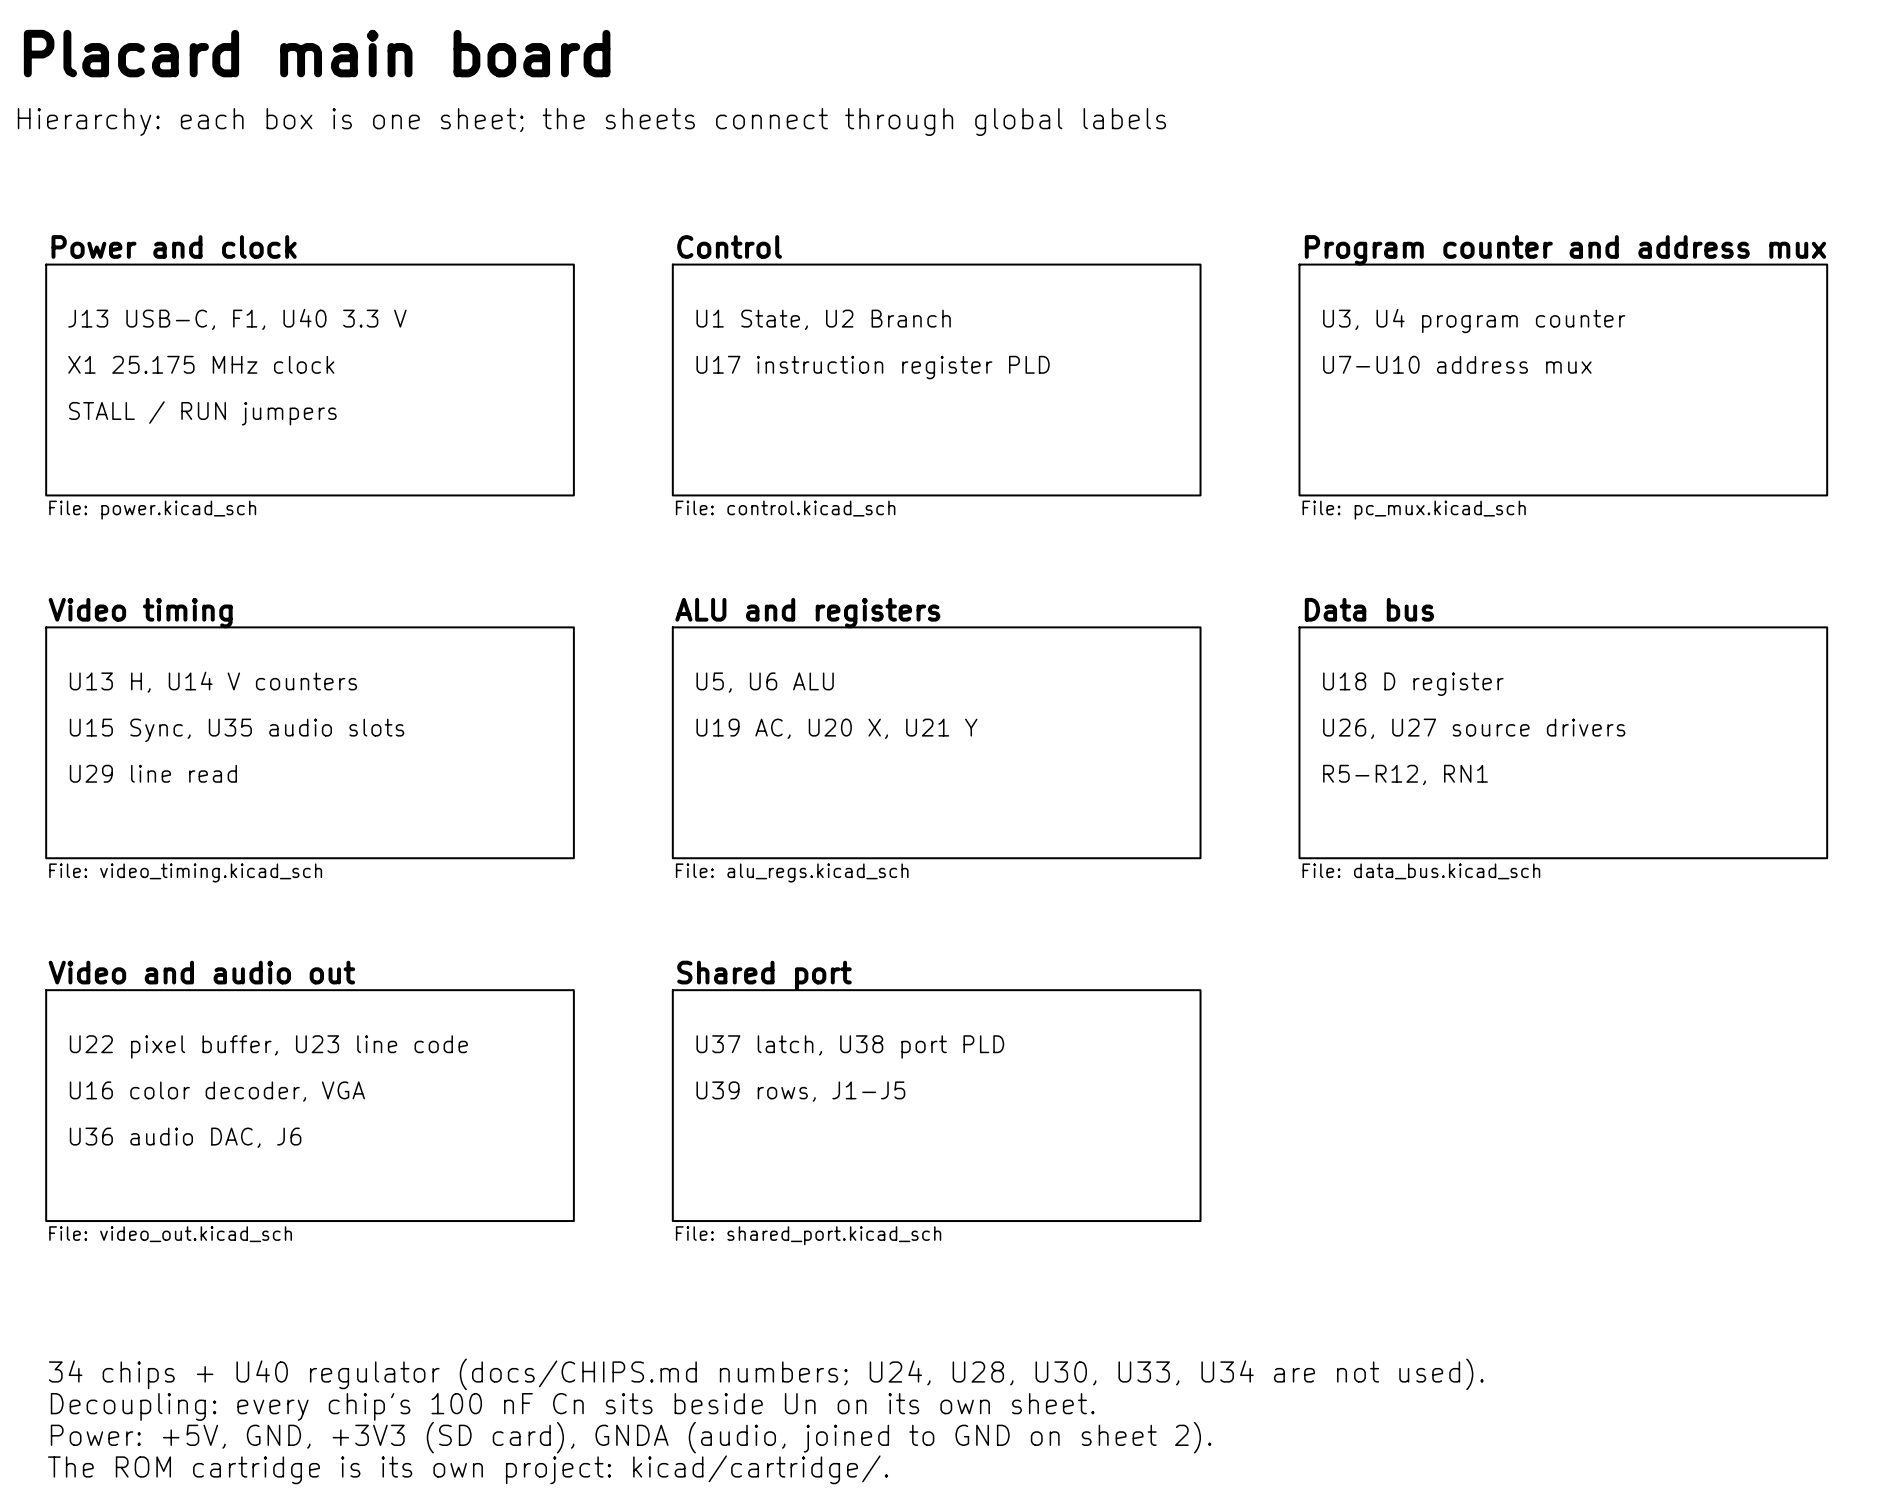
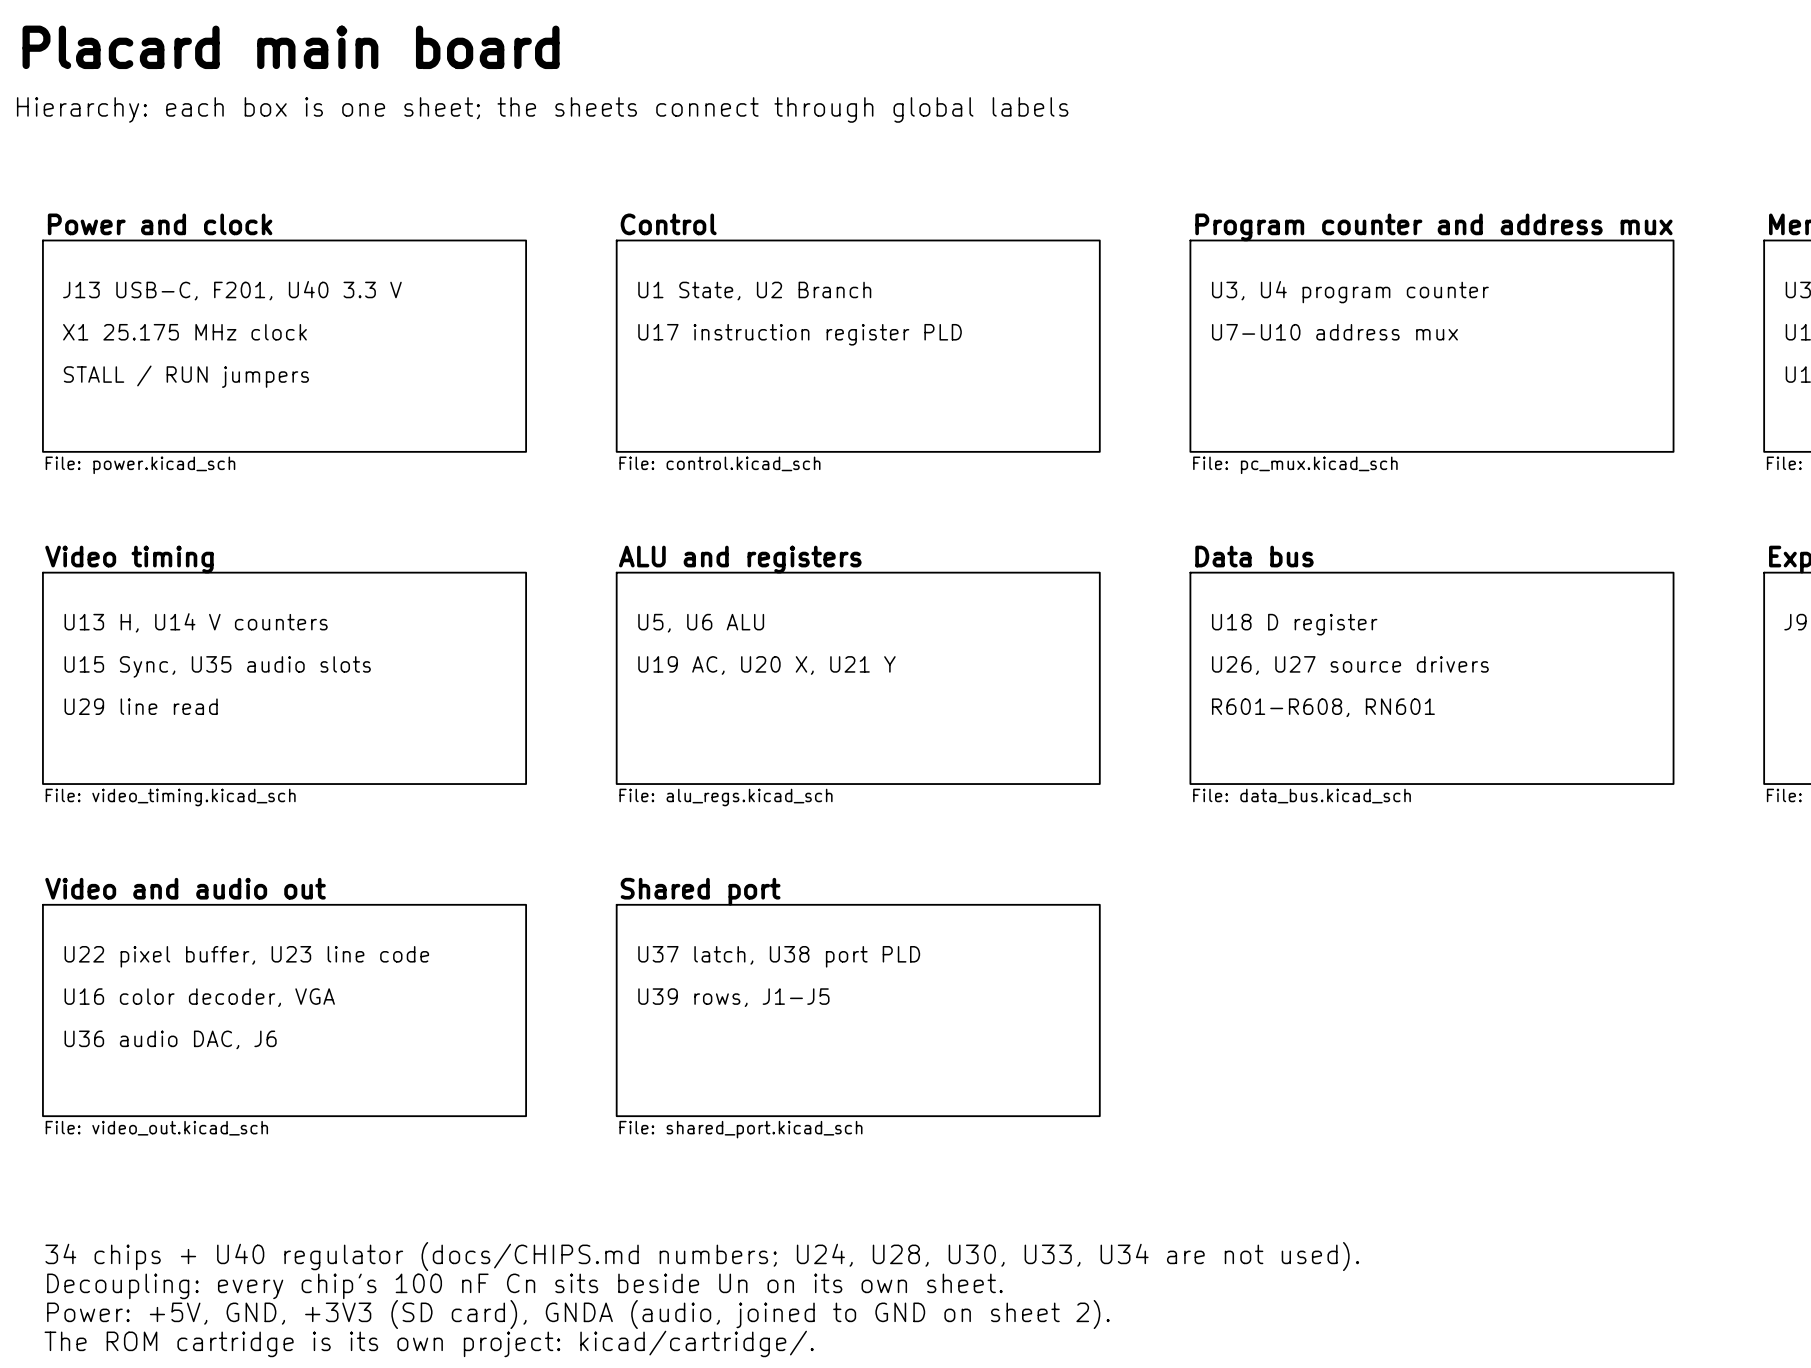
text: J13 USB-C, F1, U40 3.3 V (237, 319) -> J13 USB-C, F201, U40 3.3 V (232, 290)
text: R5-R12, RN1 (1405, 774) -> R601-R608, RN601 (1323, 707)

